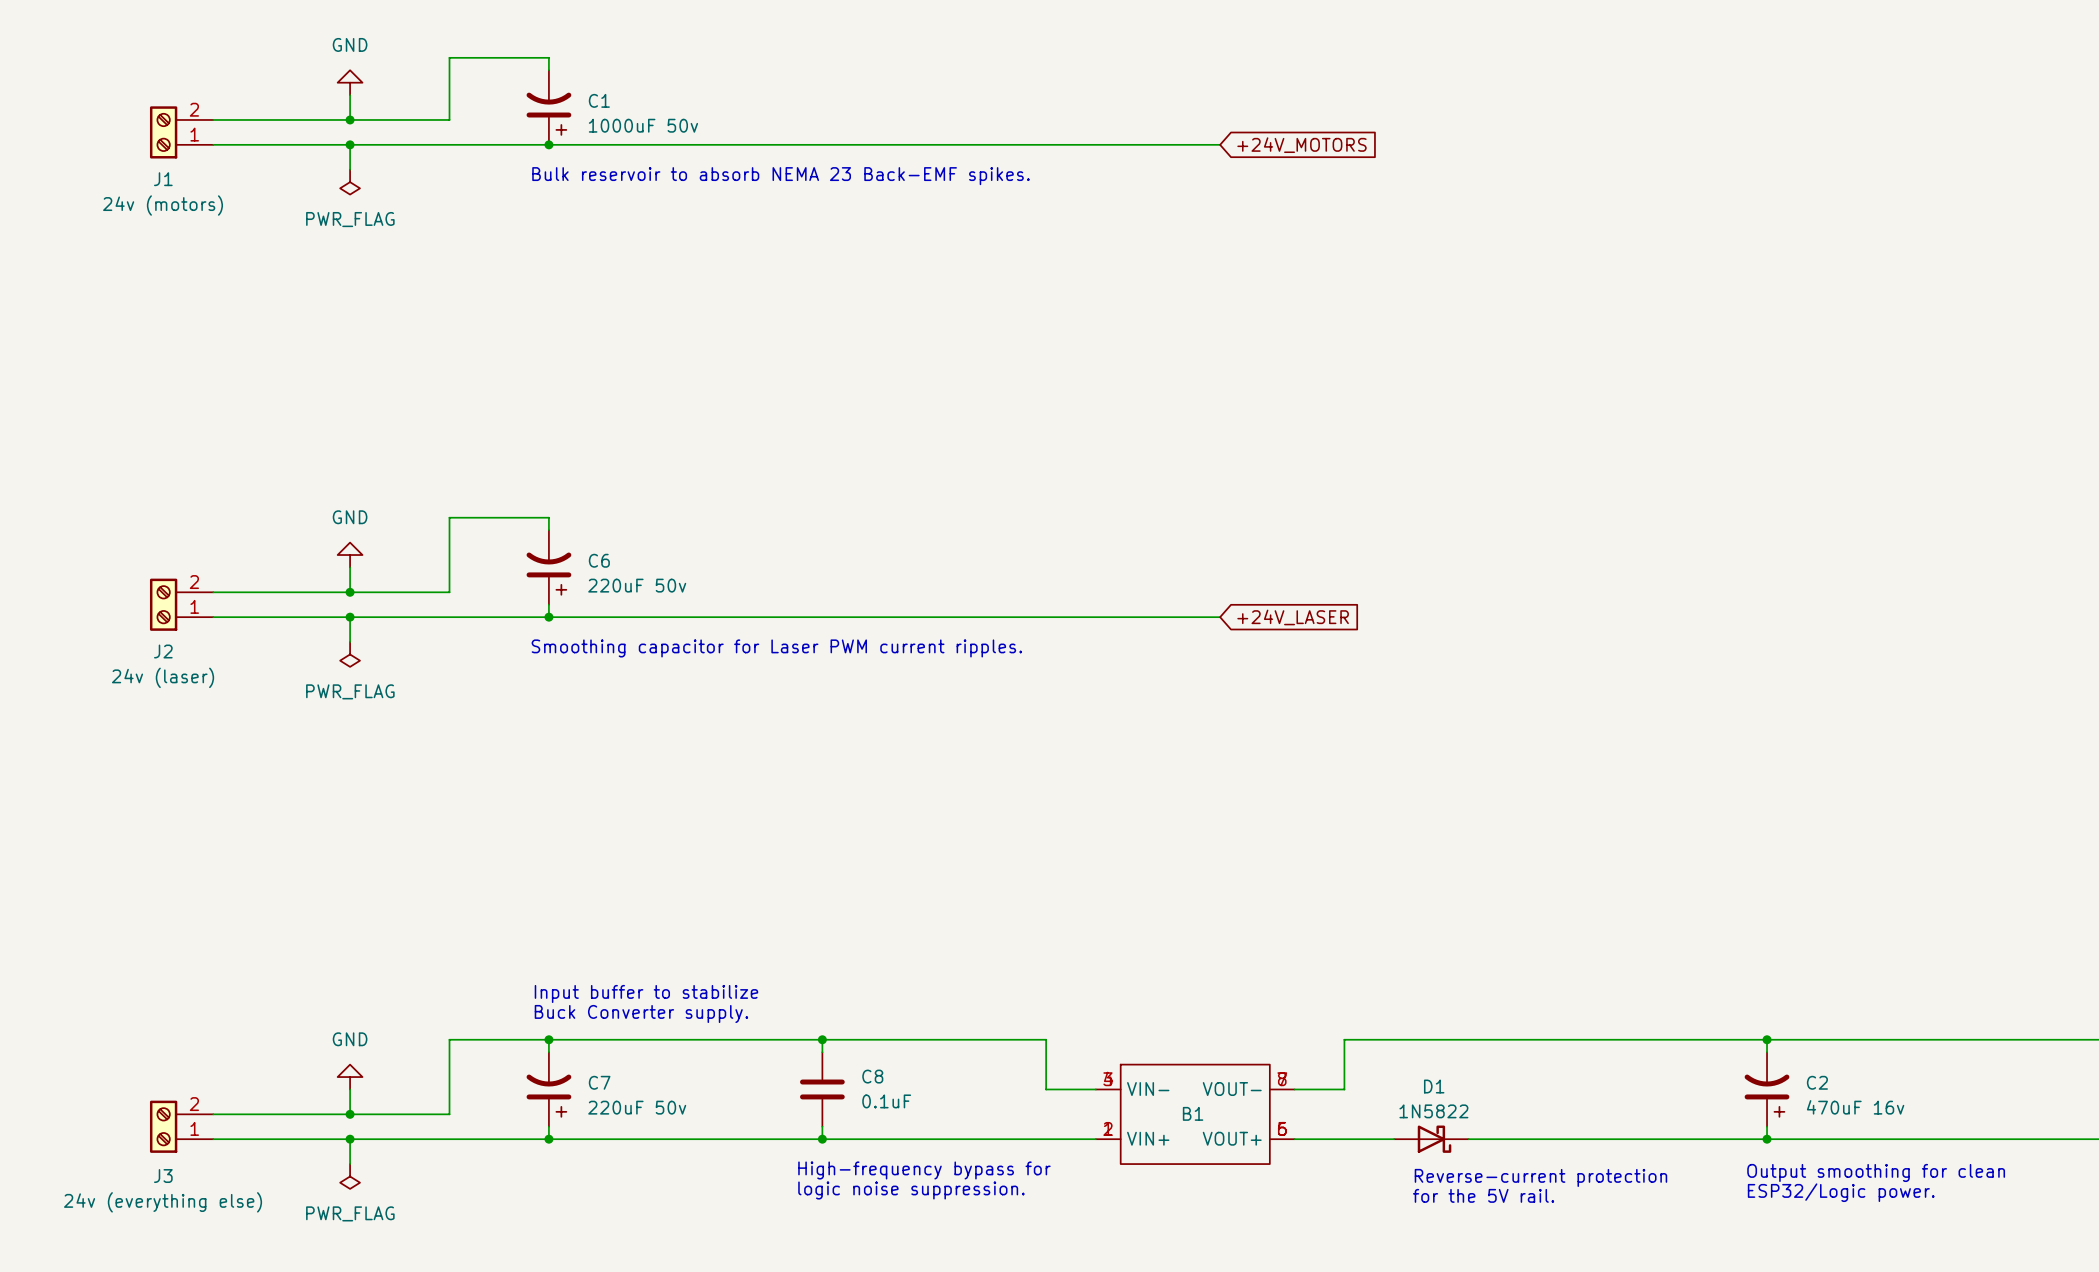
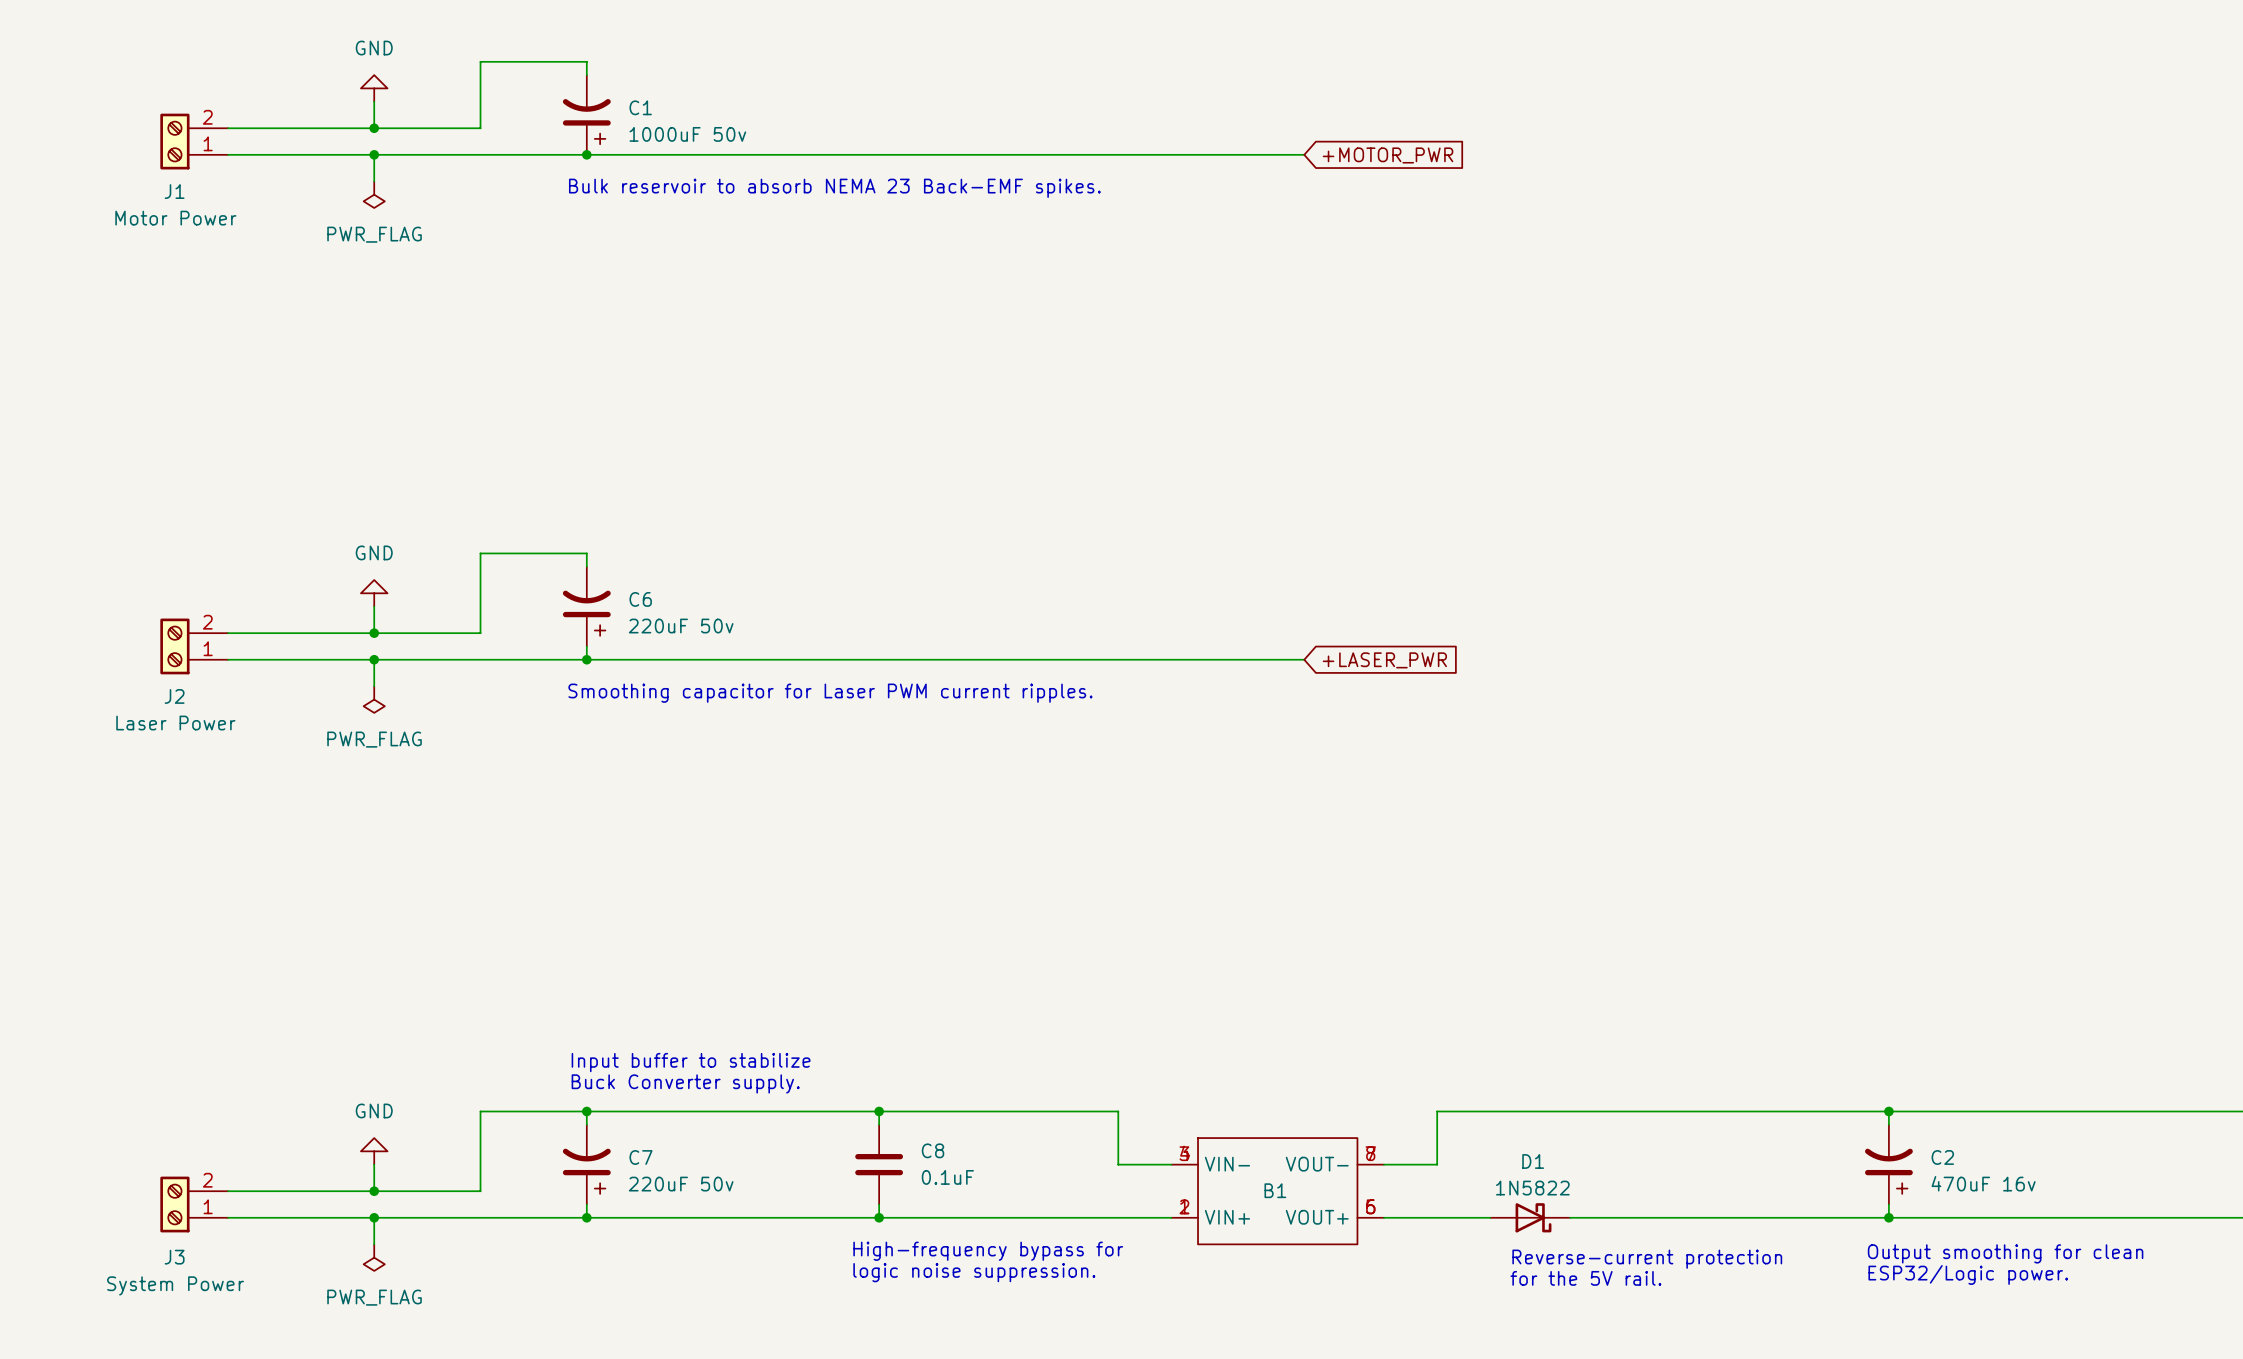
global label: +24V_MOTORS (1301, 145) -> +MOTOR_PWR (1388, 155)
J1 value: 24v (motors) (163, 205) -> Motor Power (175, 218)
global label: +24V_LASER (1293, 617) -> +LASER_PWR (1384, 660)
J2 value: 24v (laser) (163, 677) -> Laser Power (175, 723)
J3 value: 24v (everything else) (163, 1202) -> System Power (175, 1285)

